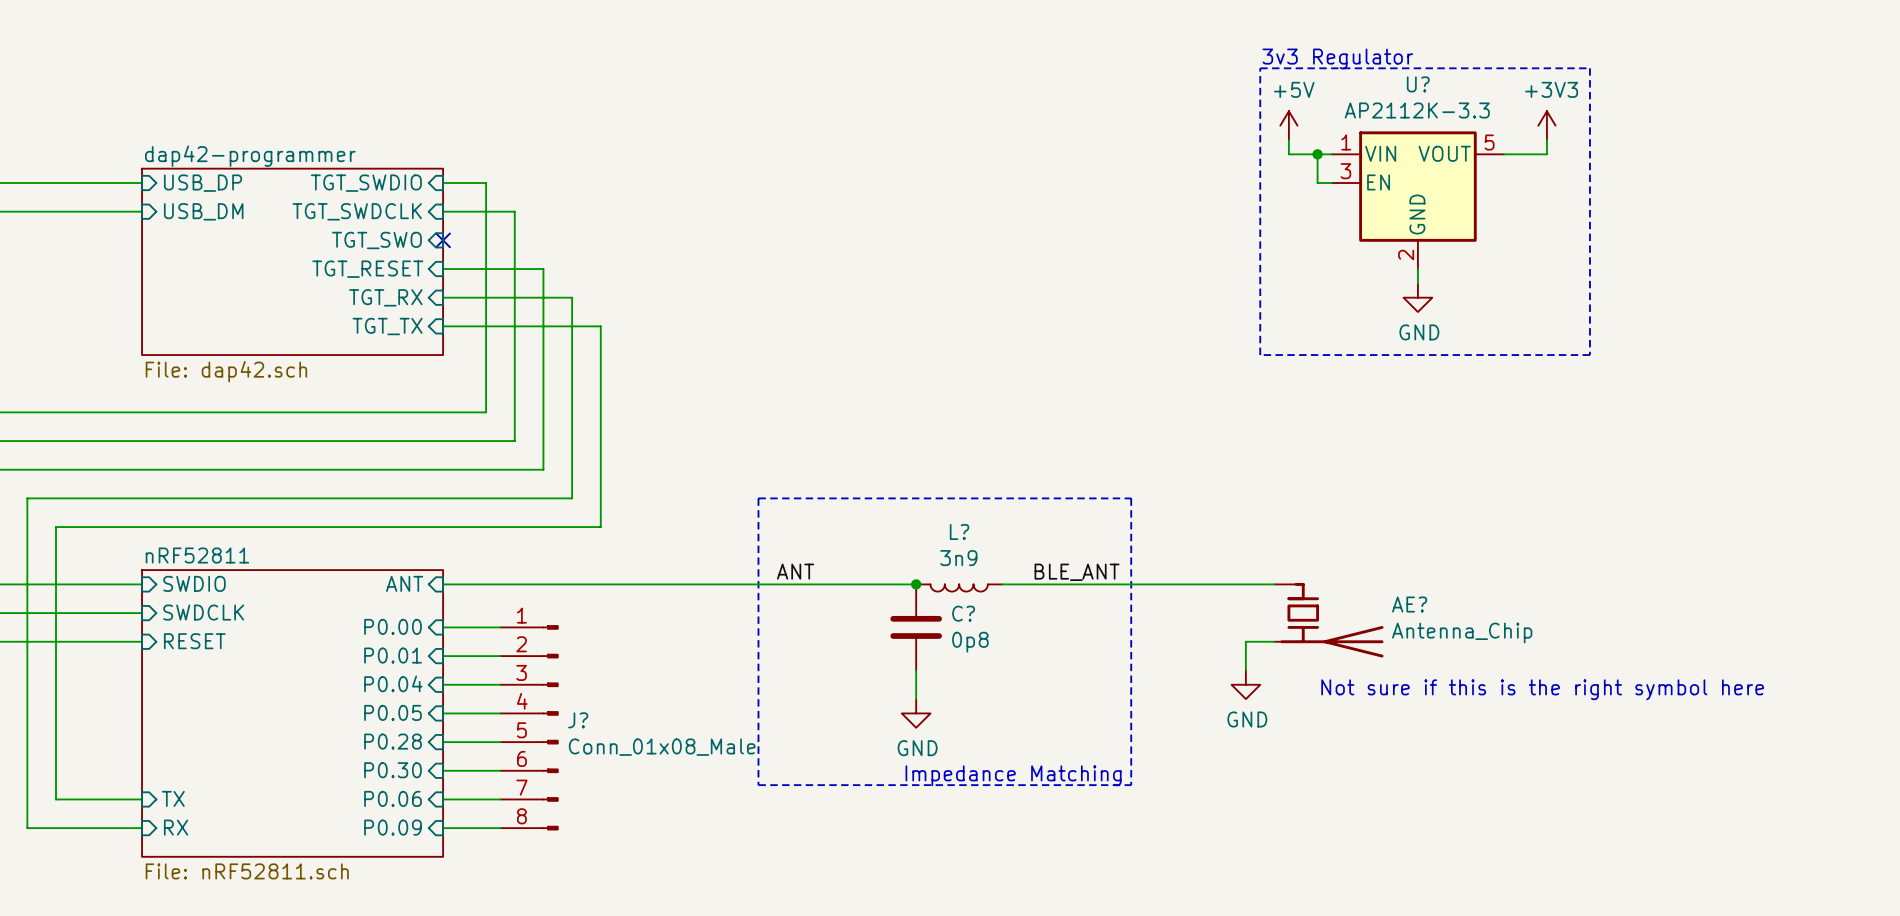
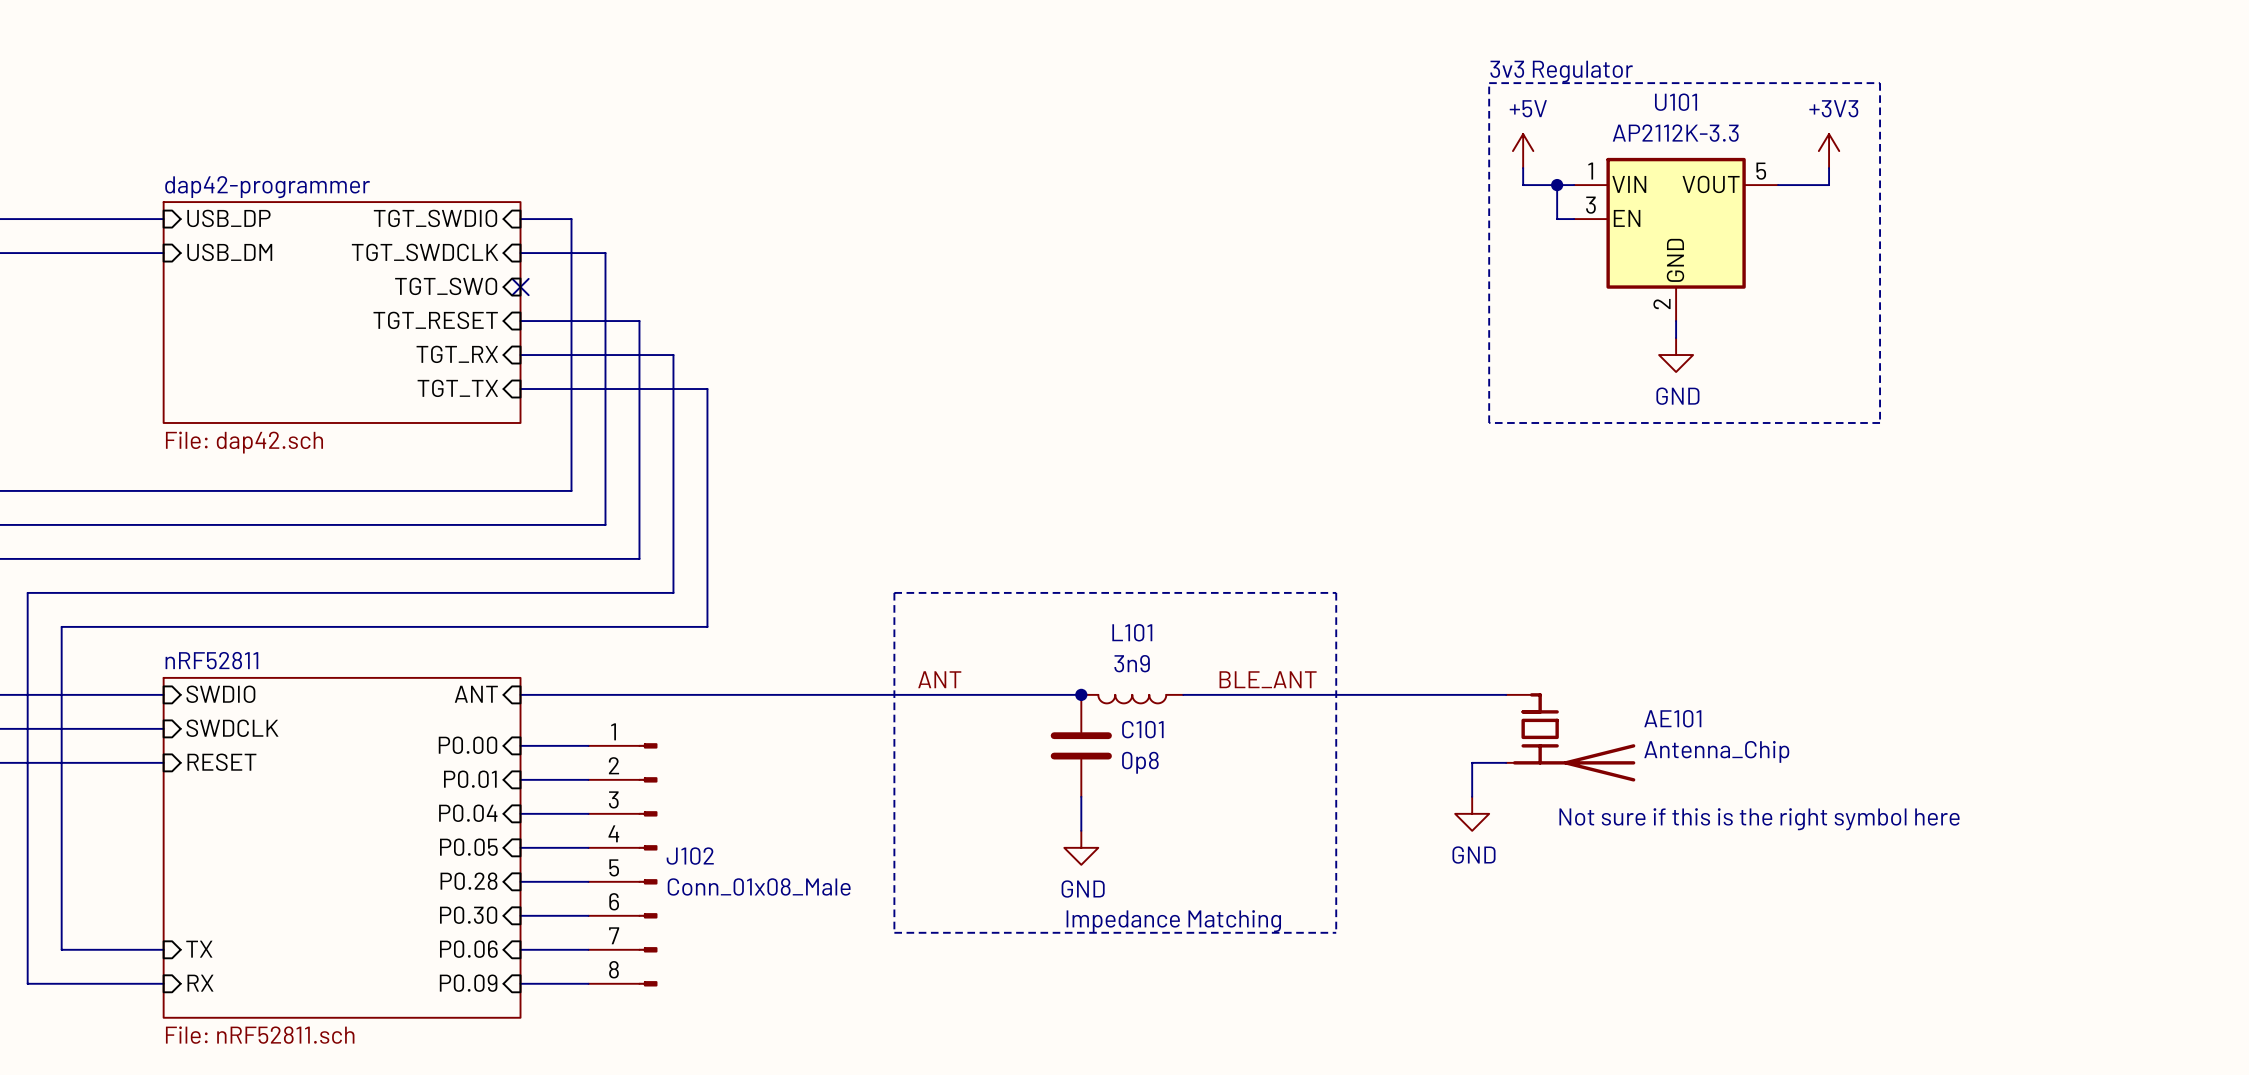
U? name: U? (1418, 84) -> U101 (1676, 102)
L? name: L? (959, 531) -> L101 (1132, 632)
AE? name: AE? (1409, 604) -> AE101 (1672, 718)
C? name: C? (963, 613) -> C101 (1142, 729)
J? name: J? (578, 720) -> J102 (690, 856)

